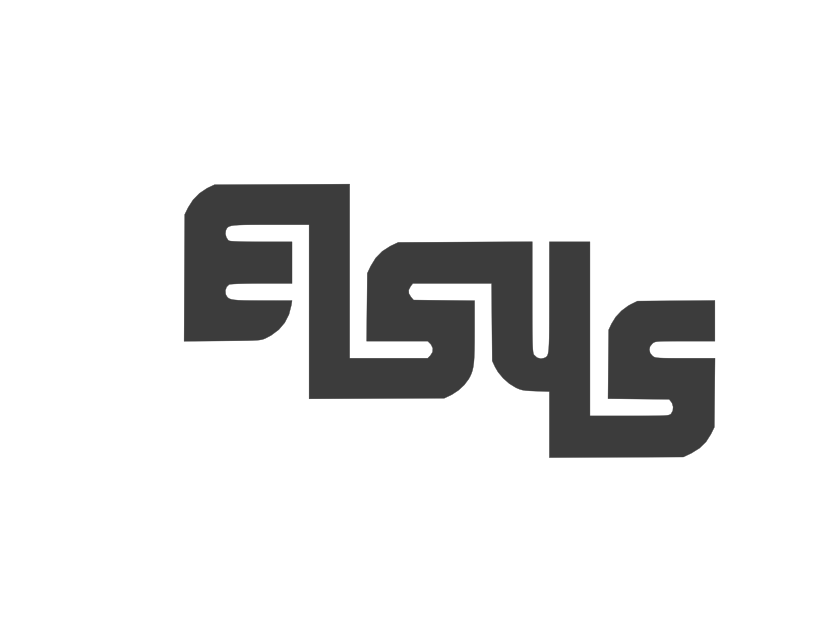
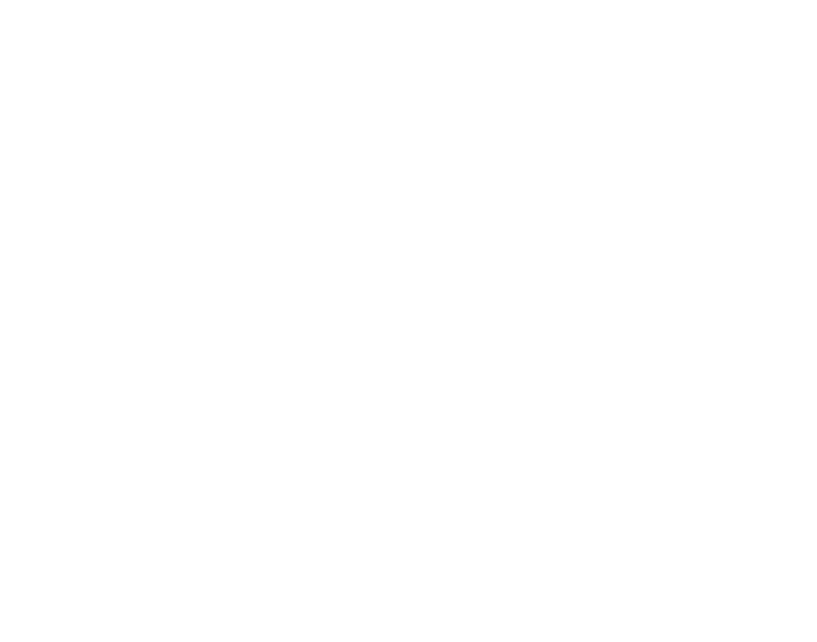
drawing: [183, 183, 716, 458] -> none

